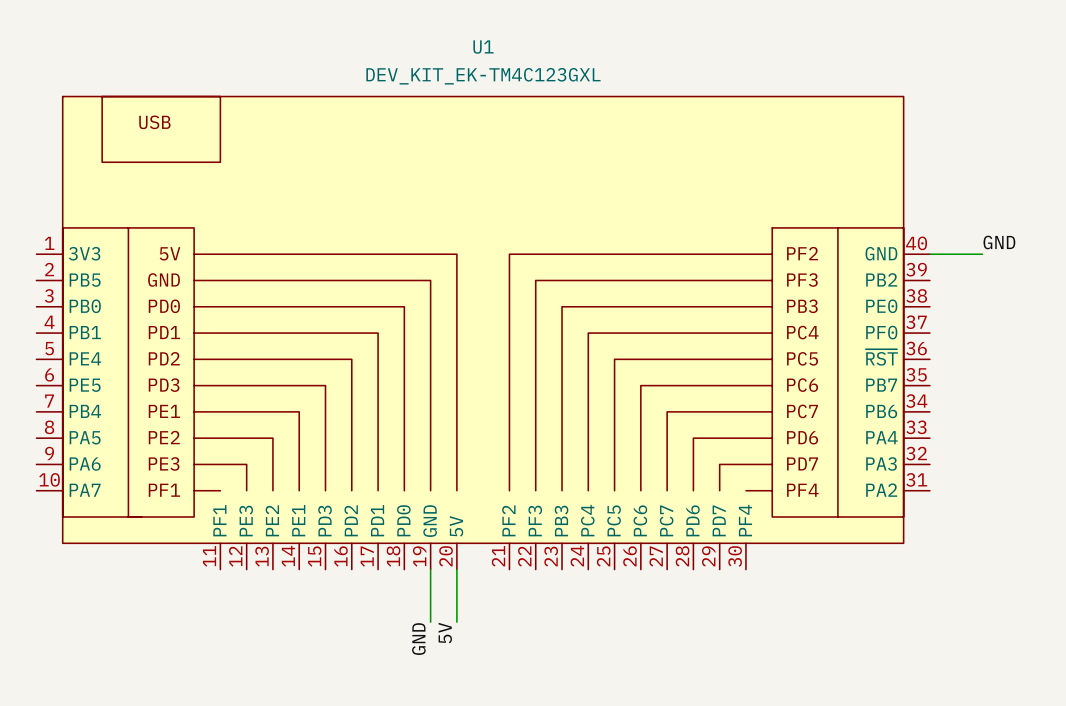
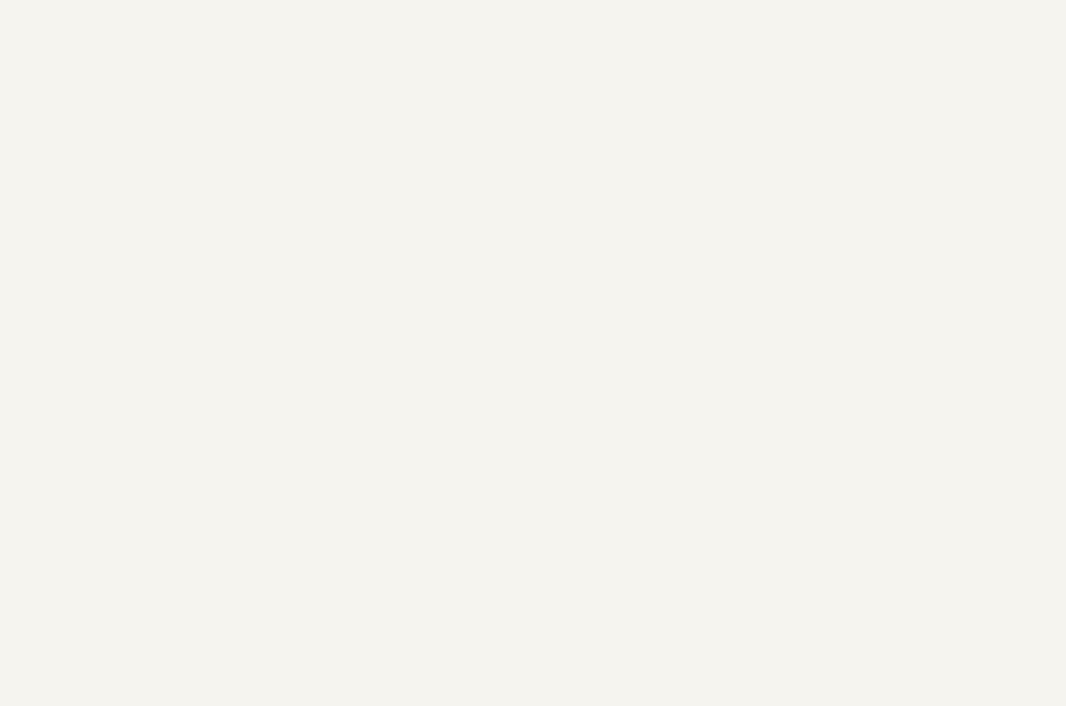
label: GND (999, 242) -> none
wire: (929, 254) (982, 254) -> none
U1: DEV_KIT_EK-TM4C123GXL (483, 333) -> none
wire: (430, 569) (430, 622) -> none
wire: (456, 569) (456, 622) -> none
label: 5V (445, 633) -> none
label: GND (418, 639) -> none

